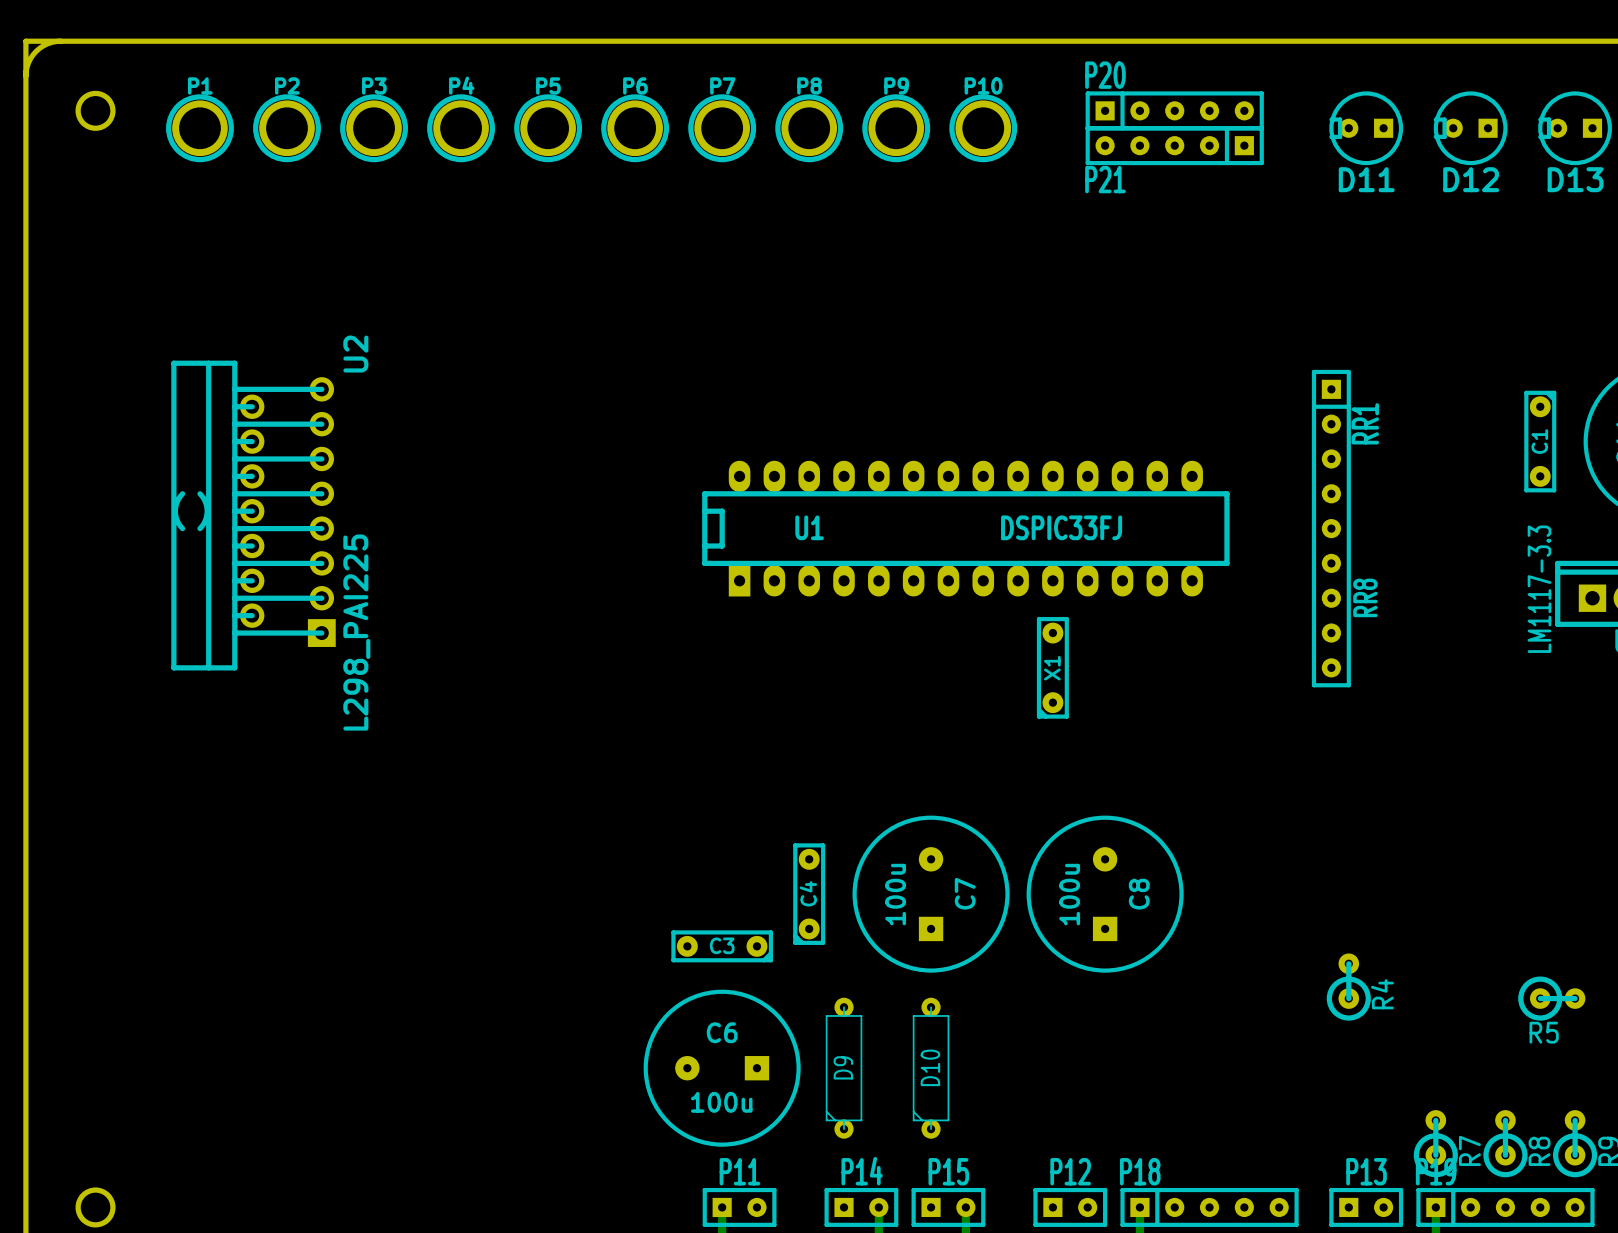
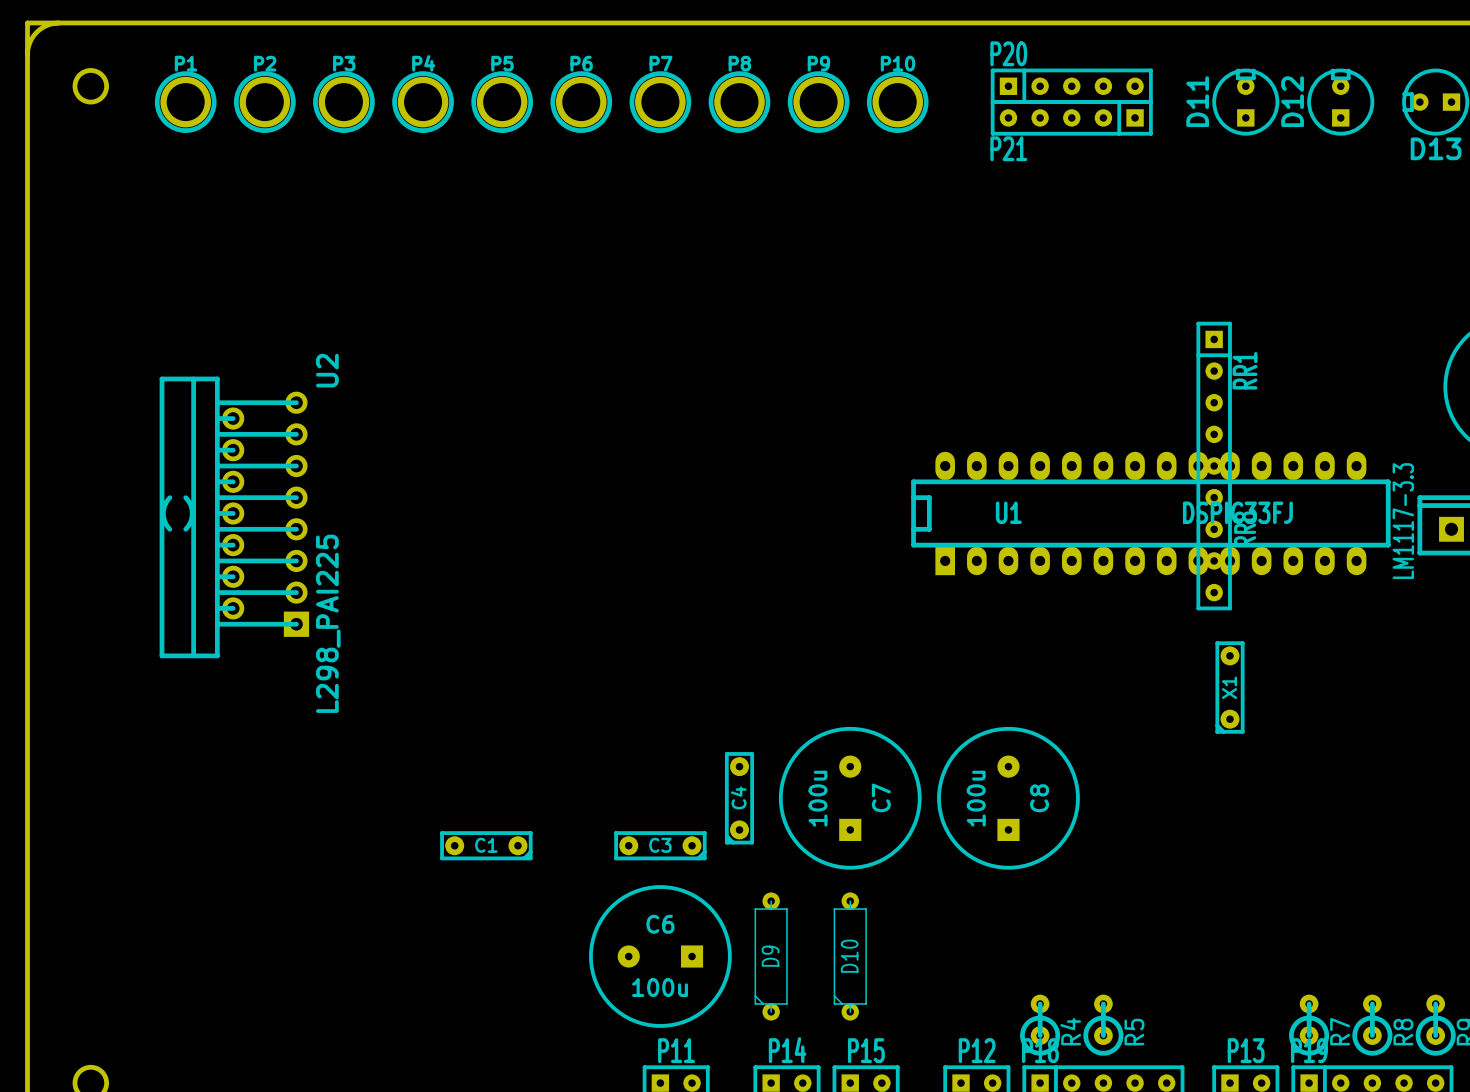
D11 rotation: 0° (1366, 128) -> 90° clockwise (1245, 102)
D12 rotation: 0° (1470, 128) -> 90° clockwise (1340, 102)
C1 rotation: 0° (1540, 441) -> 90° clockwise (486, 845)
C1 position: (1540, 441) -> (486, 845)
U2 position: (253, 515) -> (234, 517)
U1 position: (965, 528) -> (1150, 513)
X1 position: (1052, 667) -> (1229, 687)
R4 position: (1348, 987) -> (1040, 1025)
R5 rotation: 0° (1551, 998) -> 90° counterclockwise (1103, 1025)
R5 position: (1551, 998) -> (1103, 1025)

